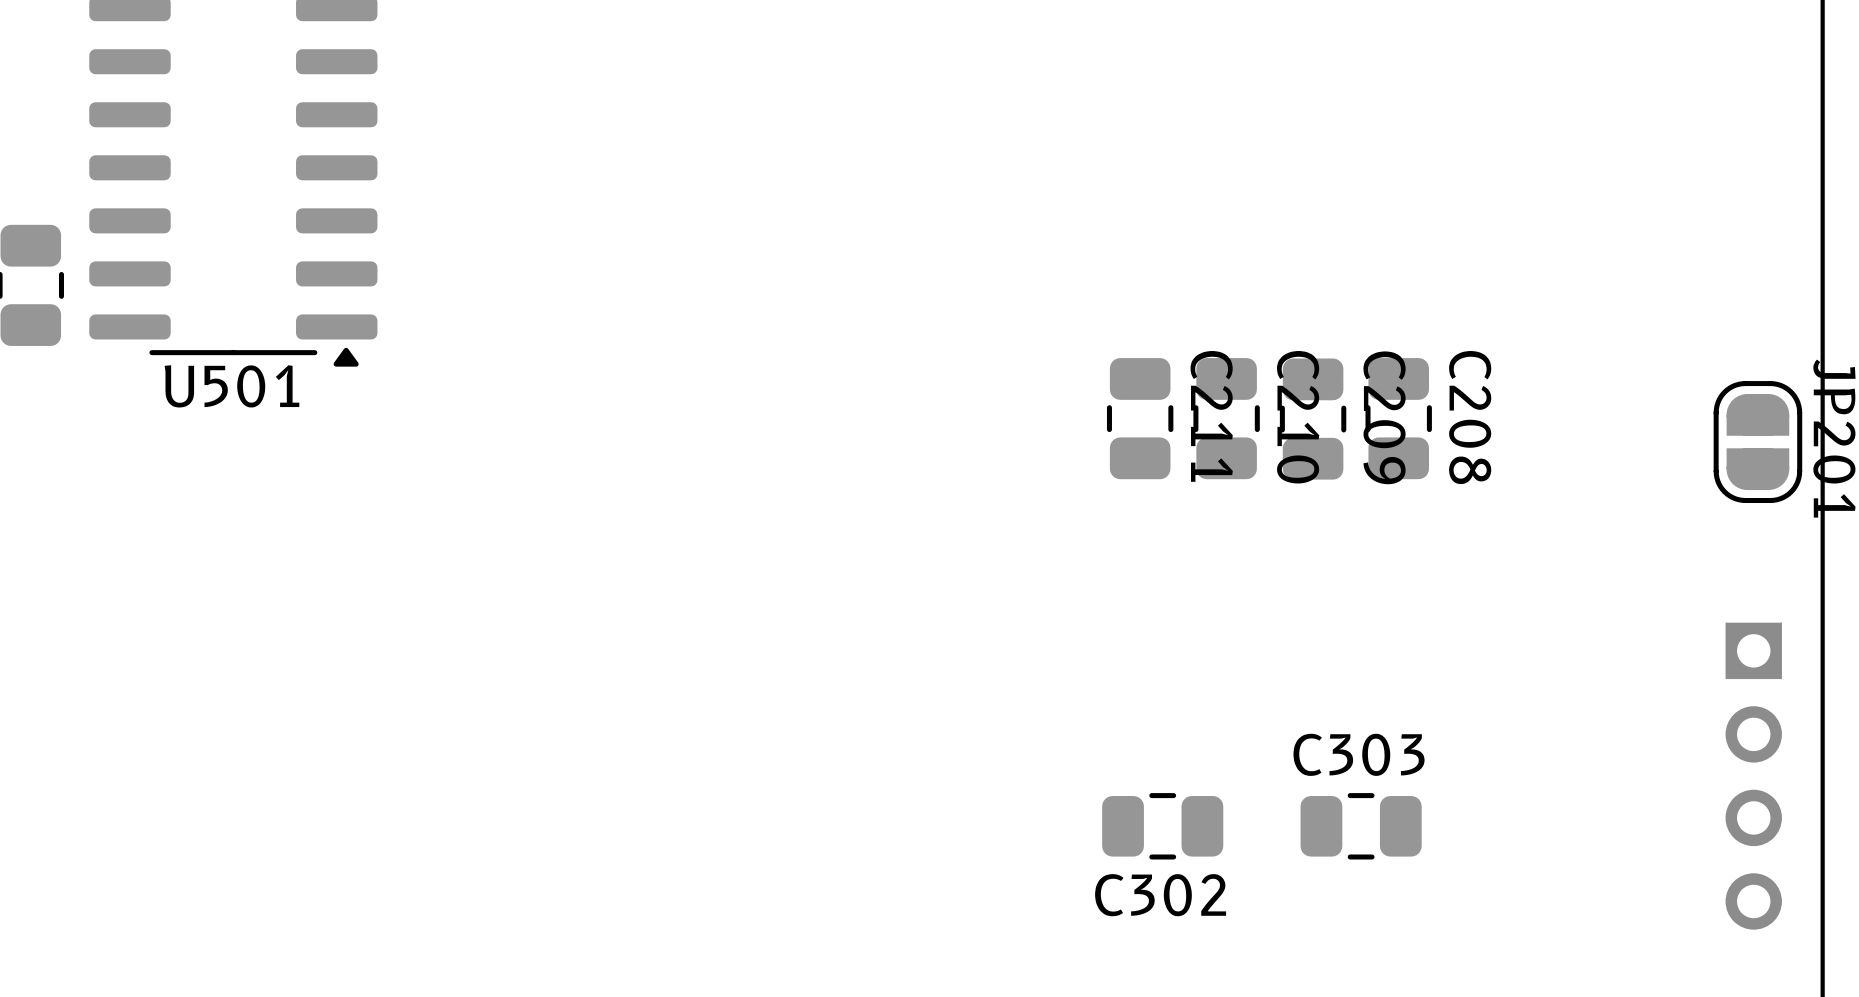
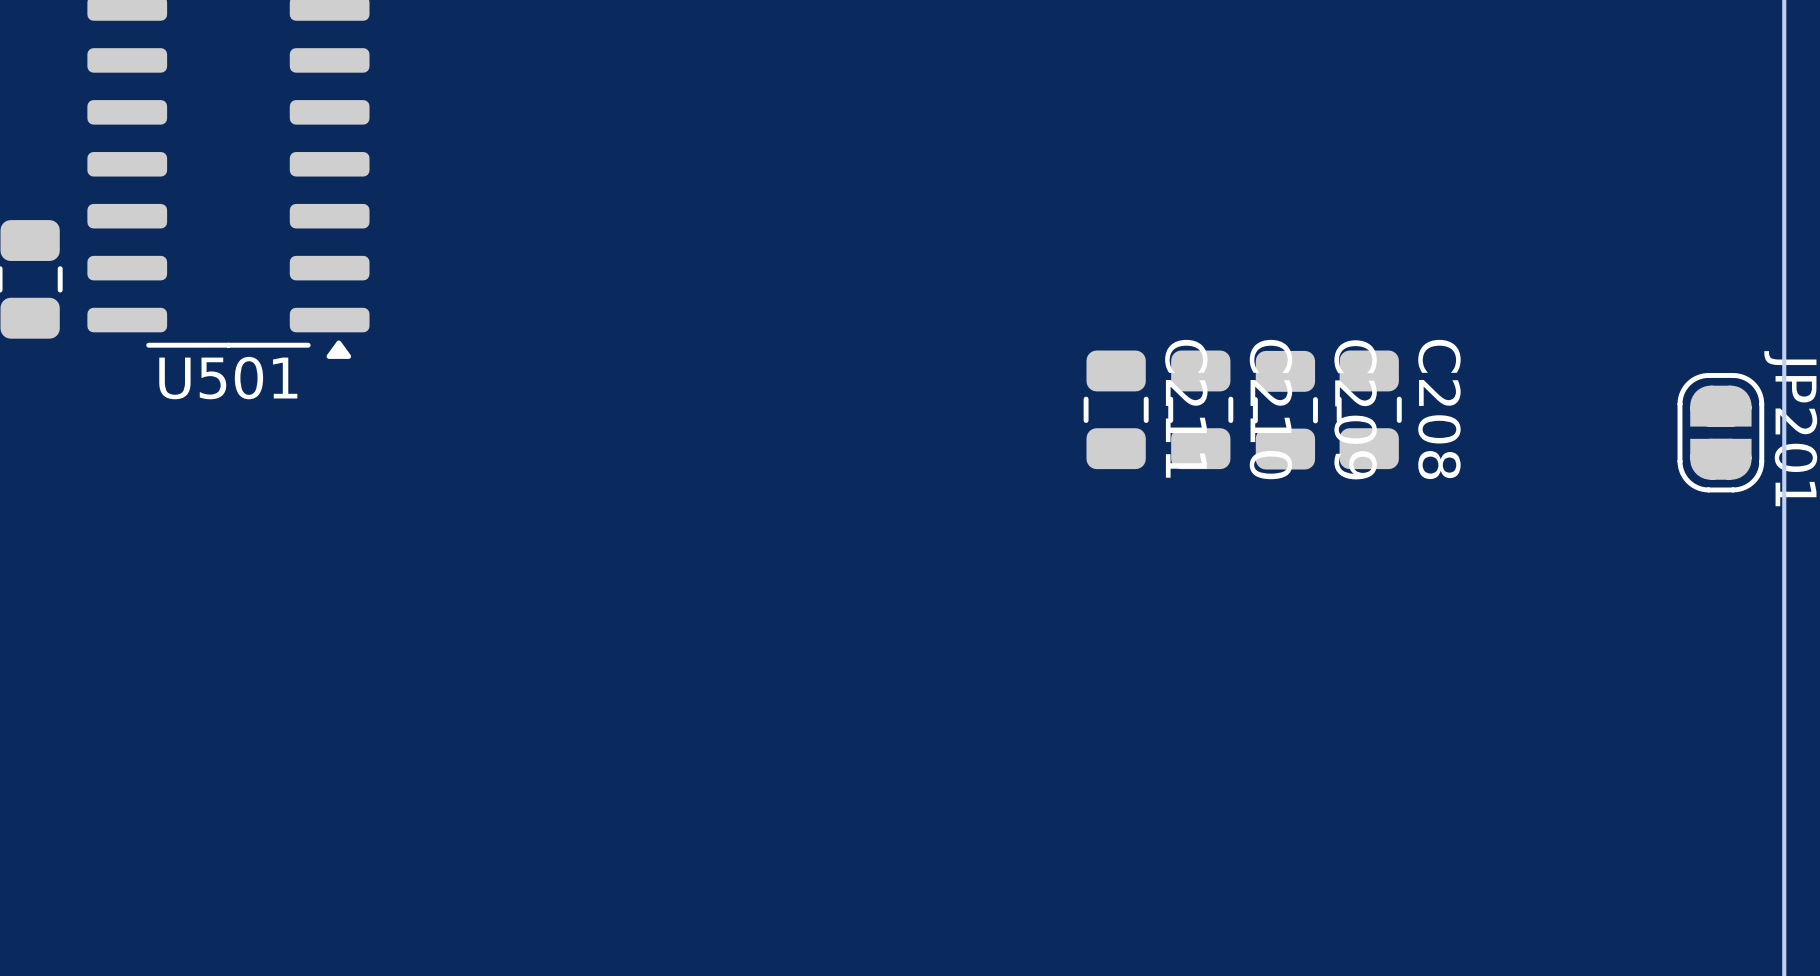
part: (1753, 776) -> none
C302: (1162, 826) -> none
C303: (1361, 826) -> none

